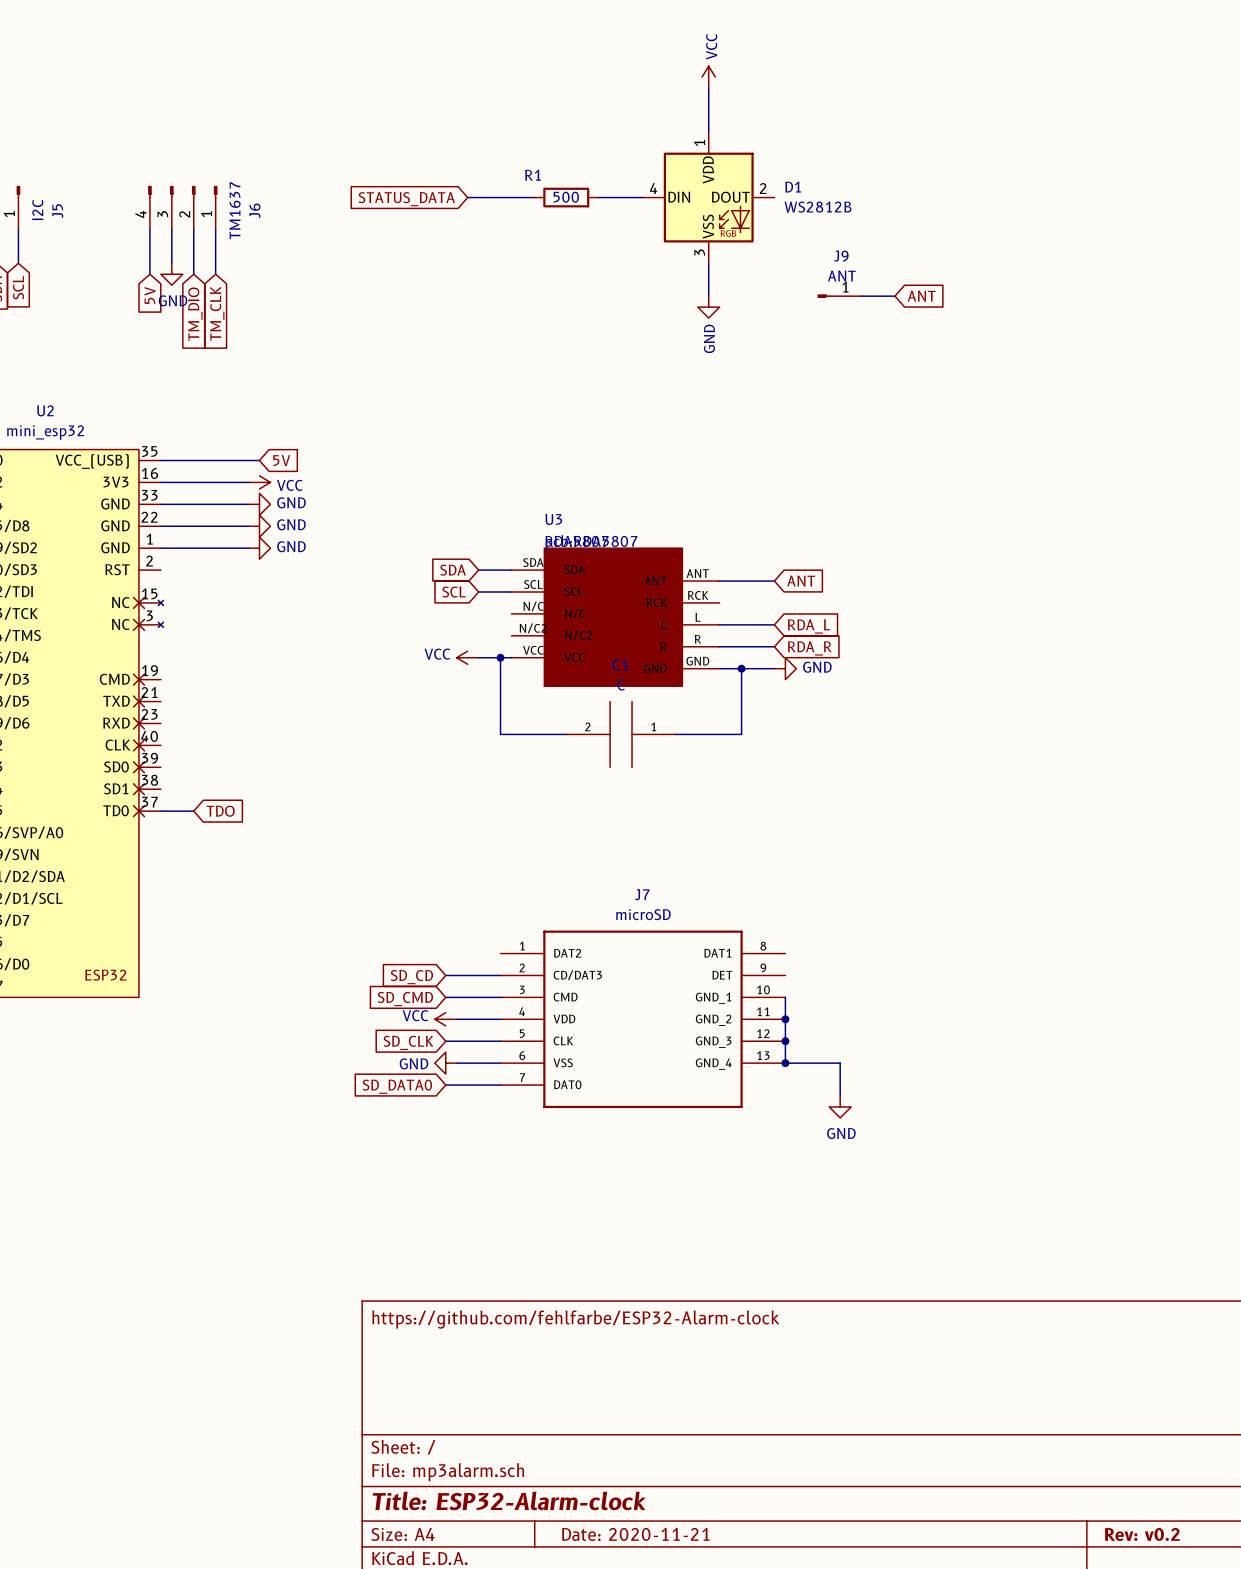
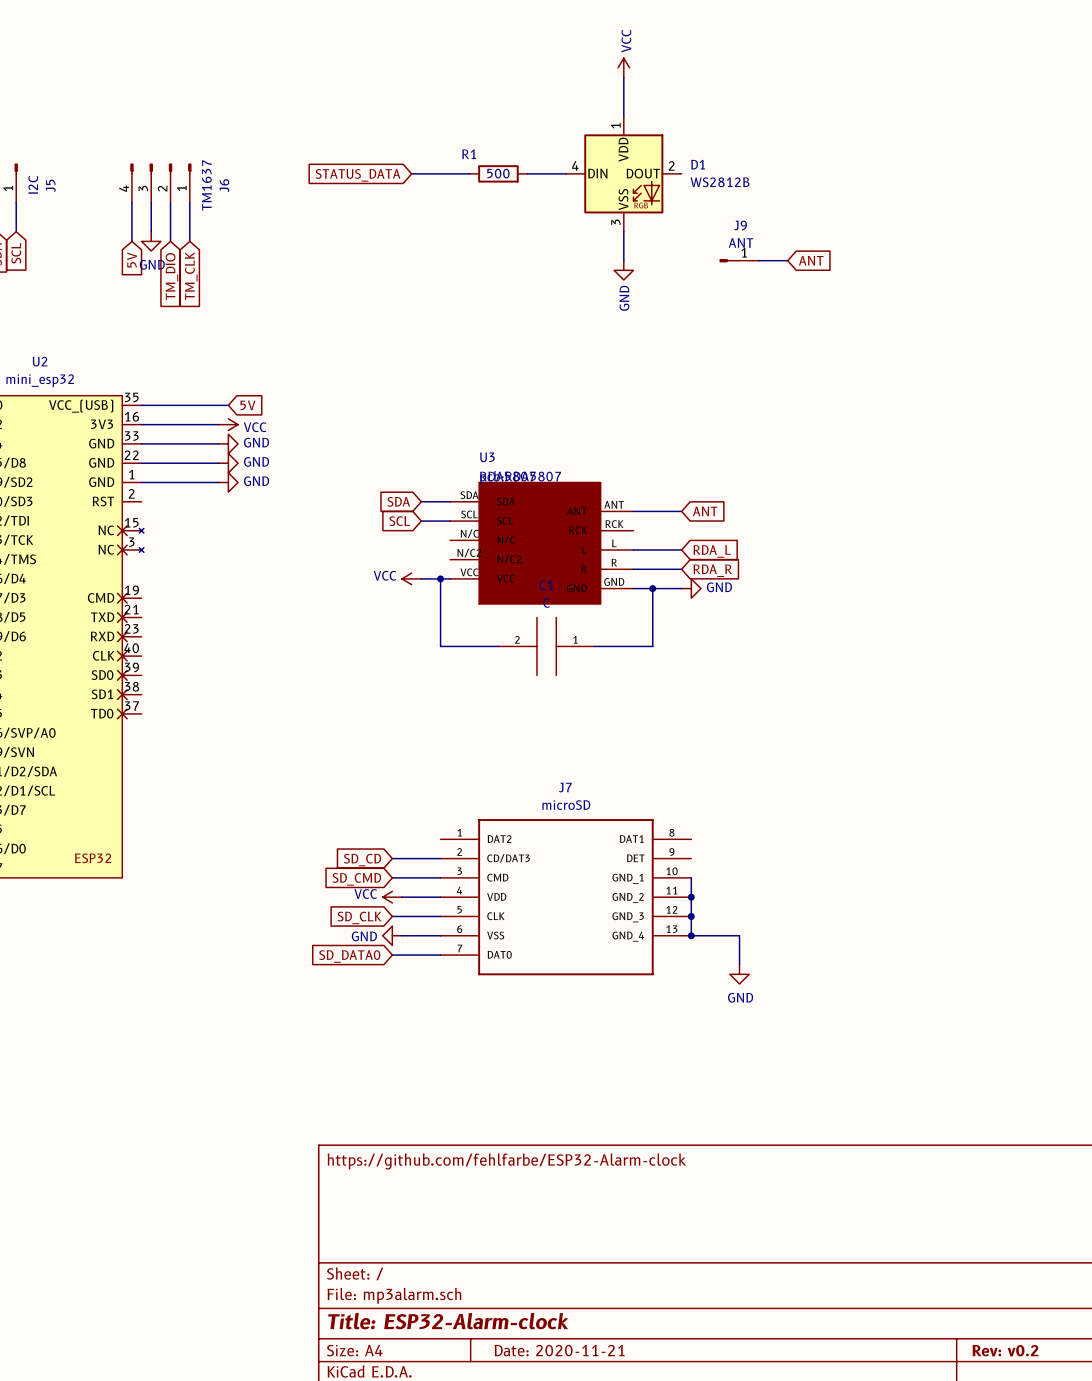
wire: (160, 811) (193, 811) -> none
global label: TDO (220, 811) -> none

